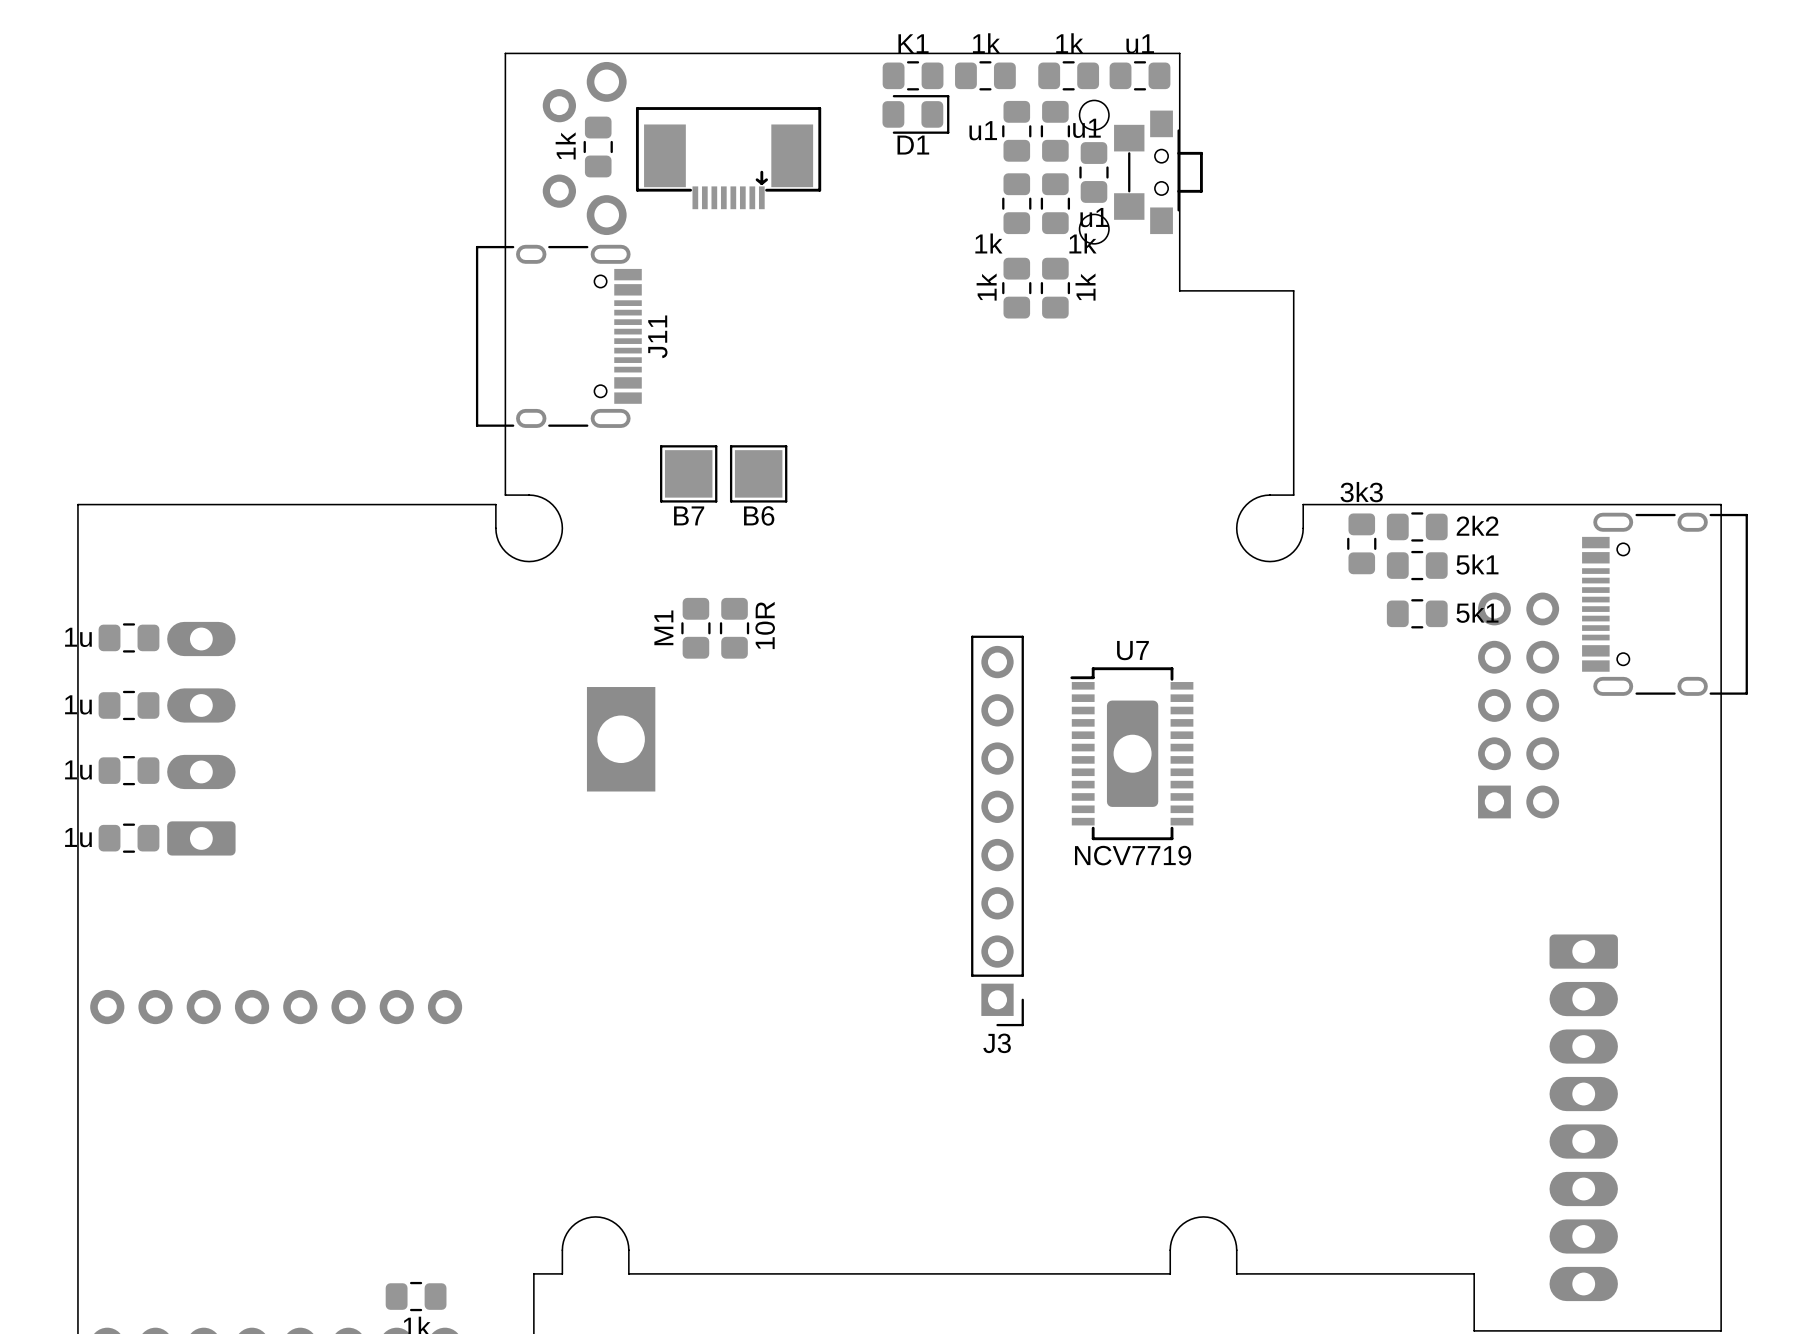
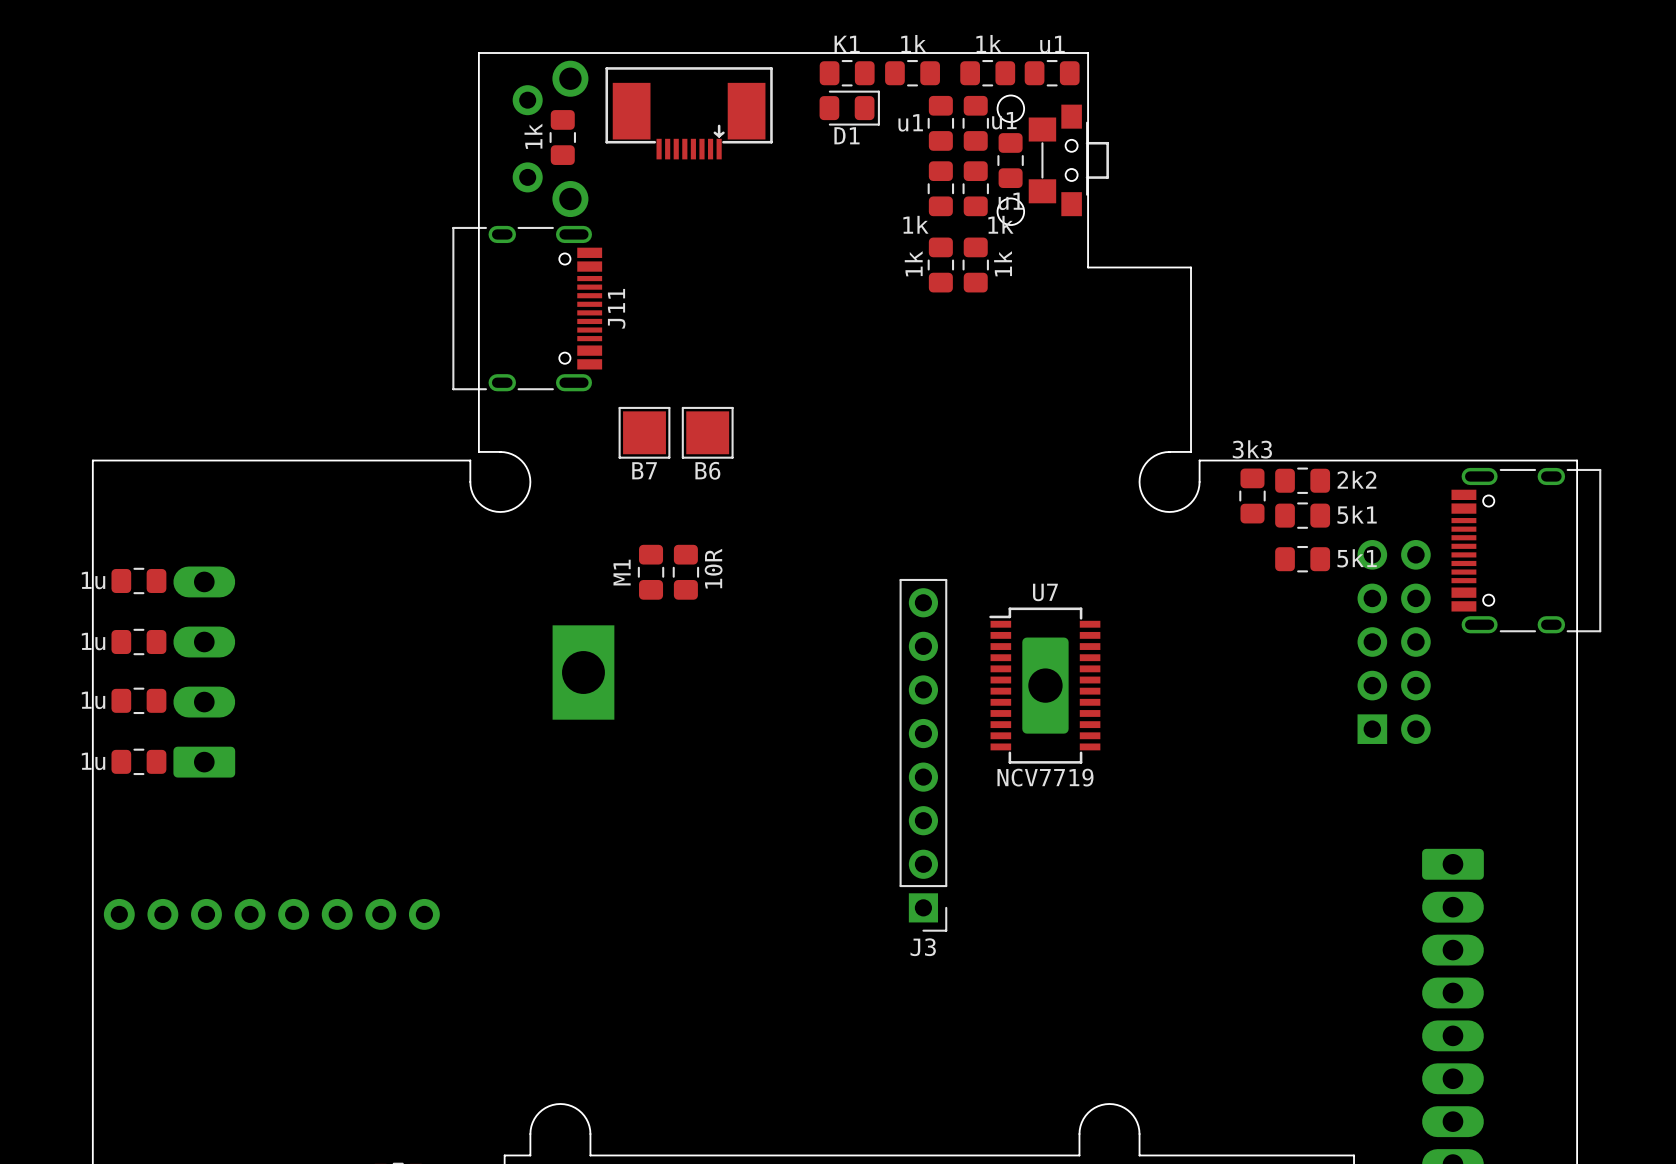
part position: (728, 158) -> (689, 113)

